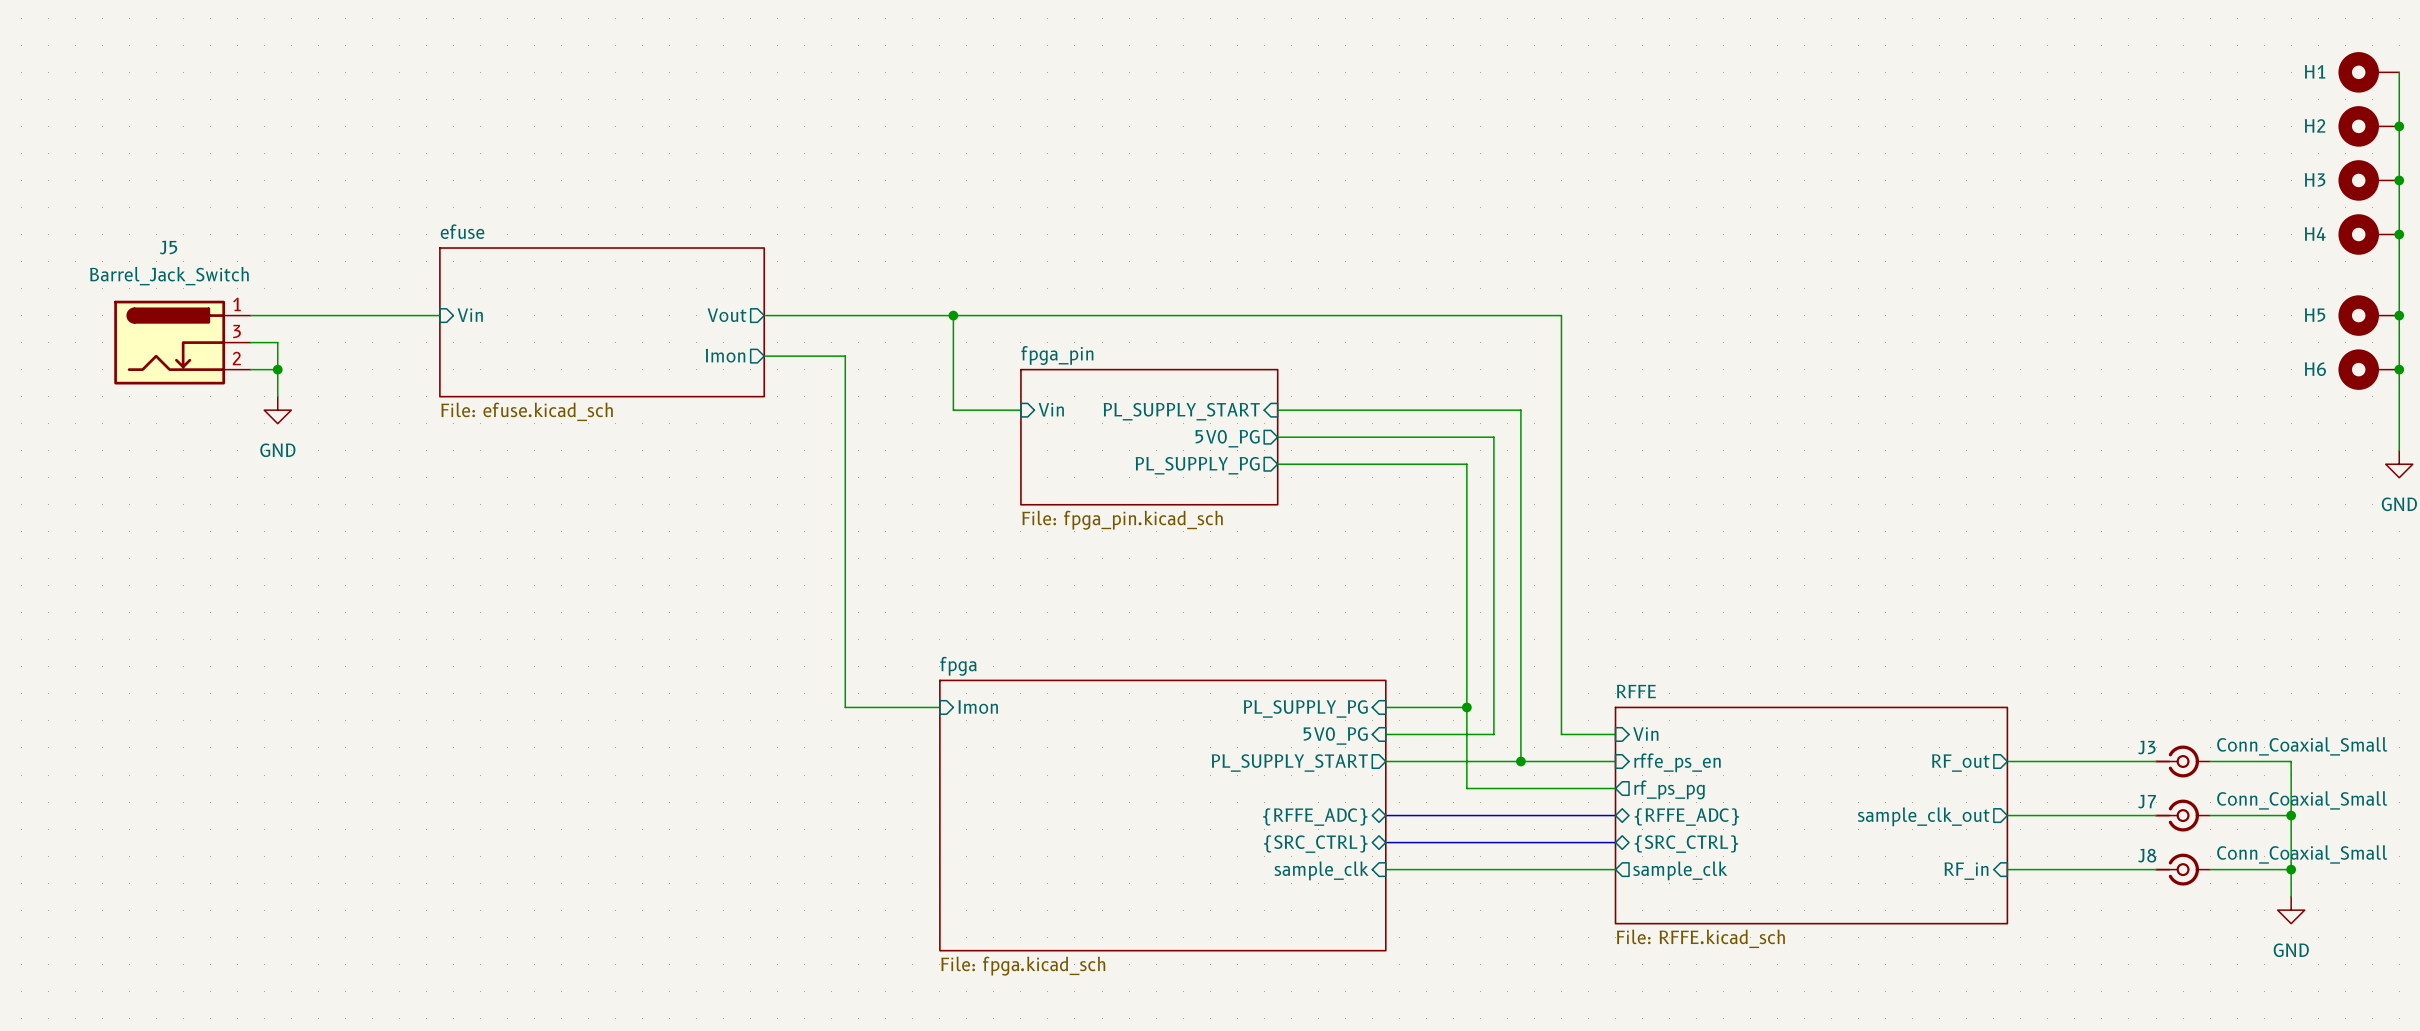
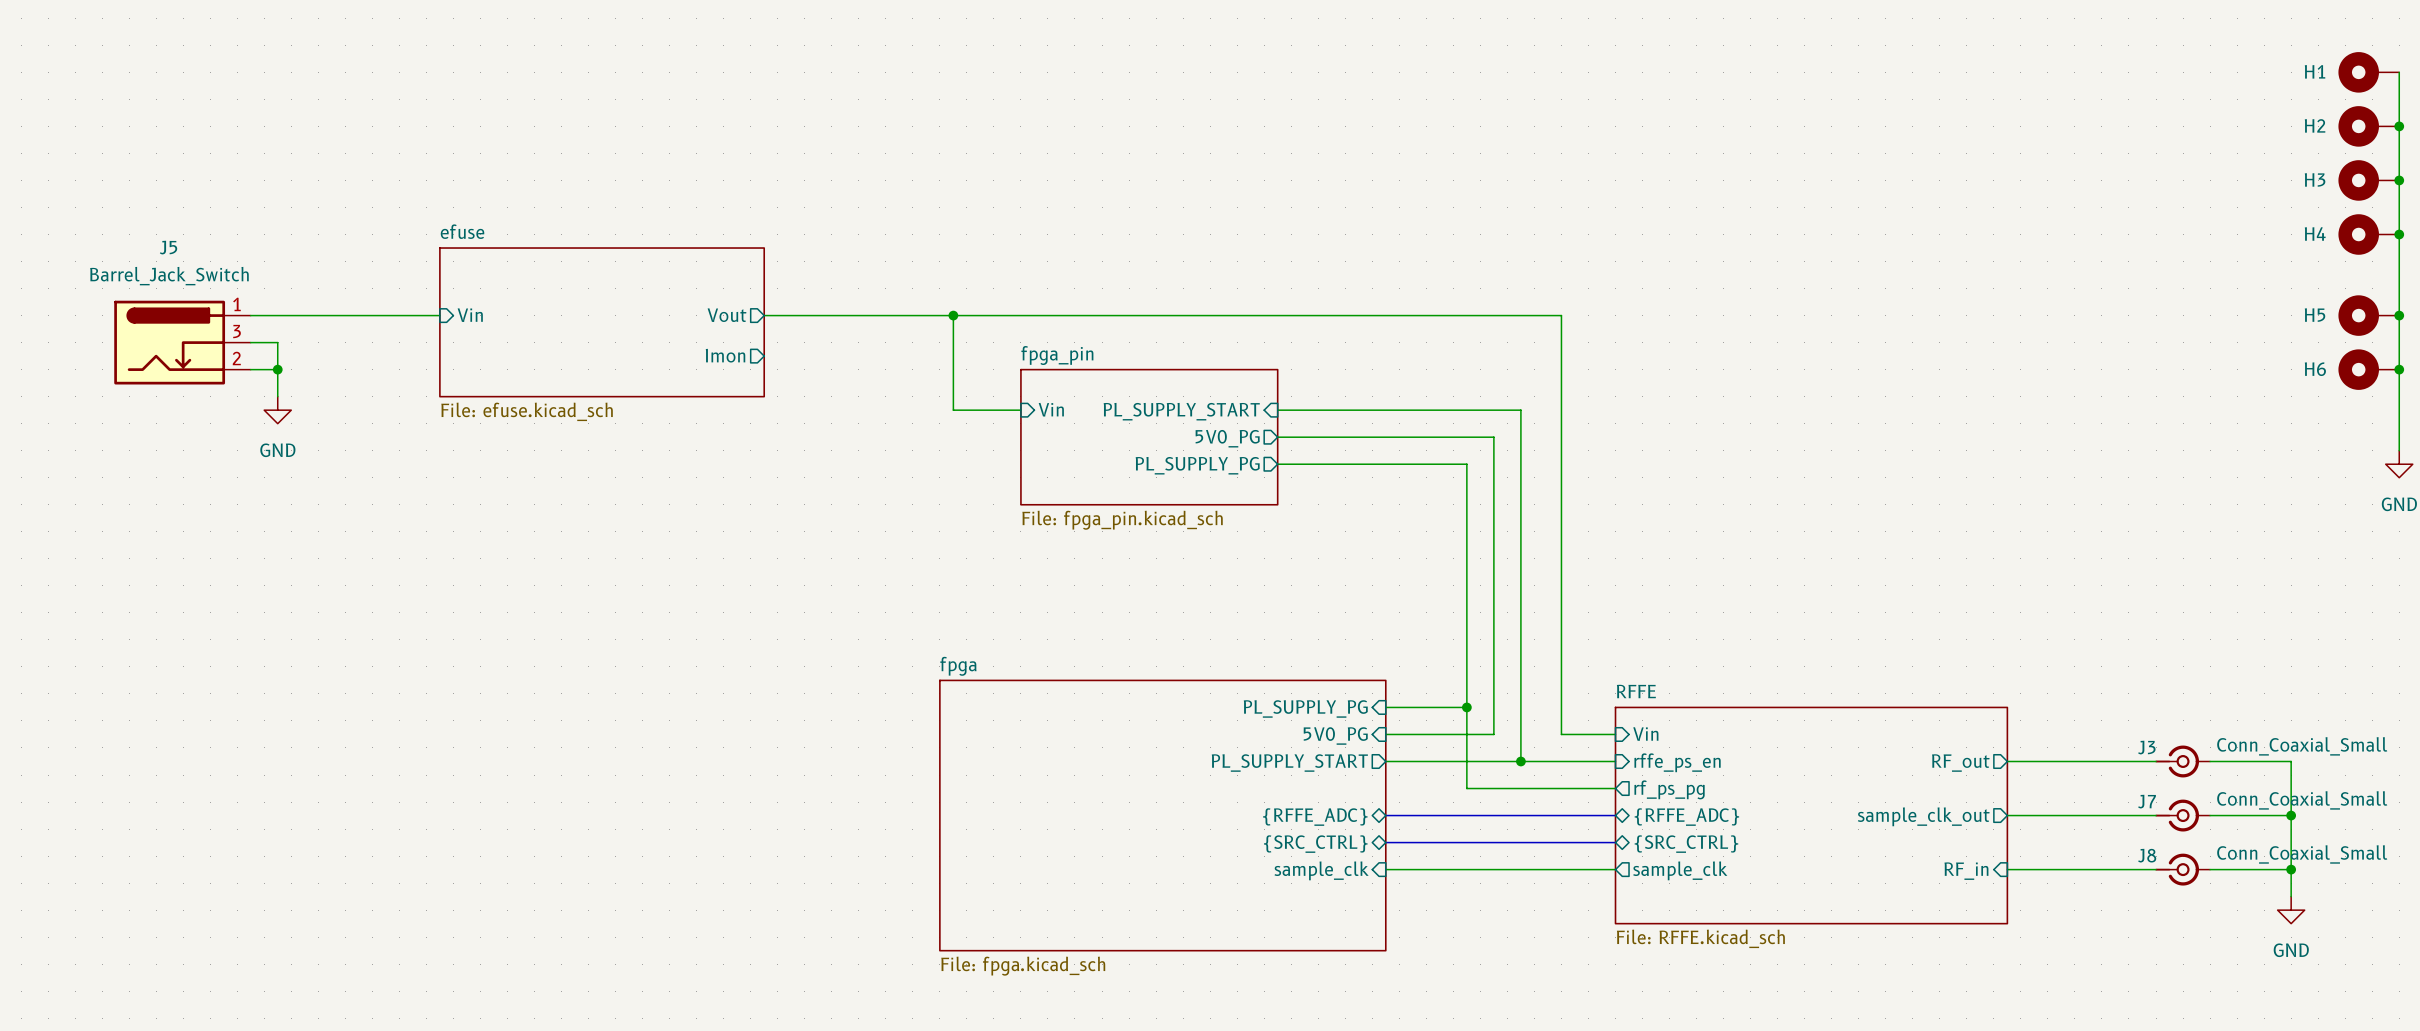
wire: (764, 356) (845, 356) (845, 707) (939, 707) -> none
sheet pin: Imon (978, 707) -> none

